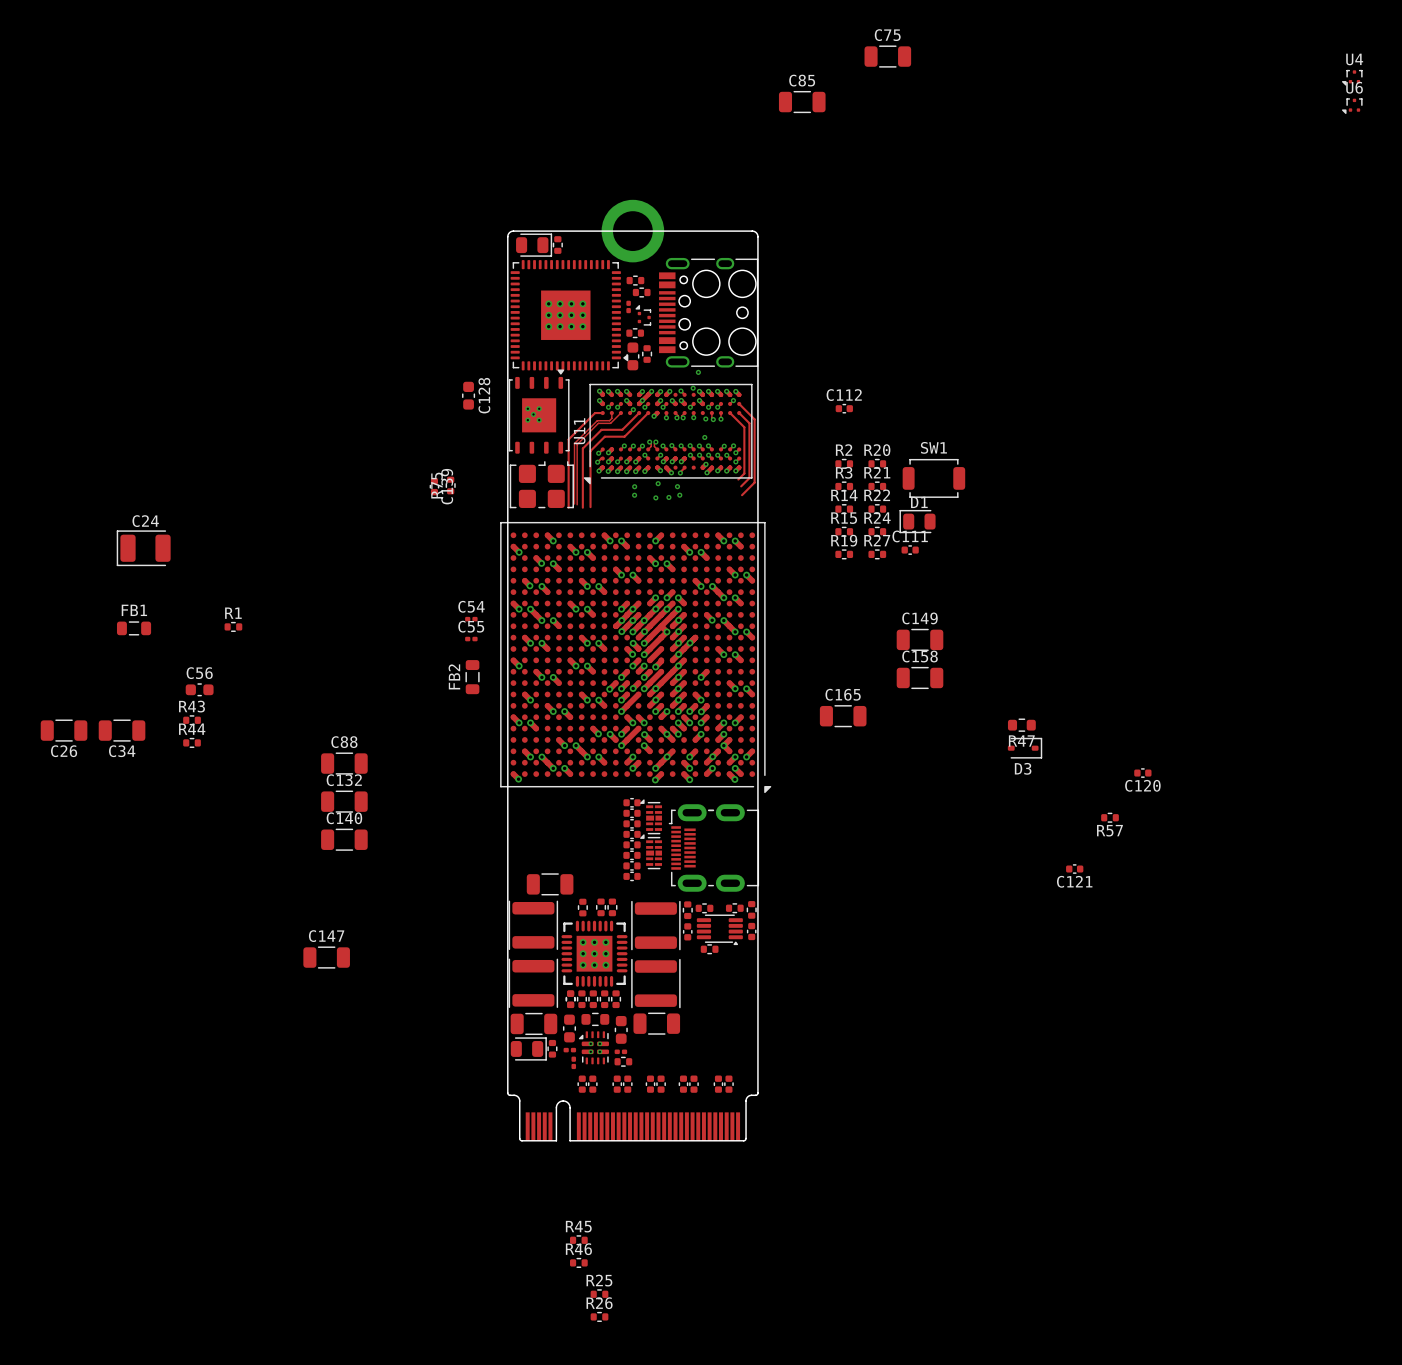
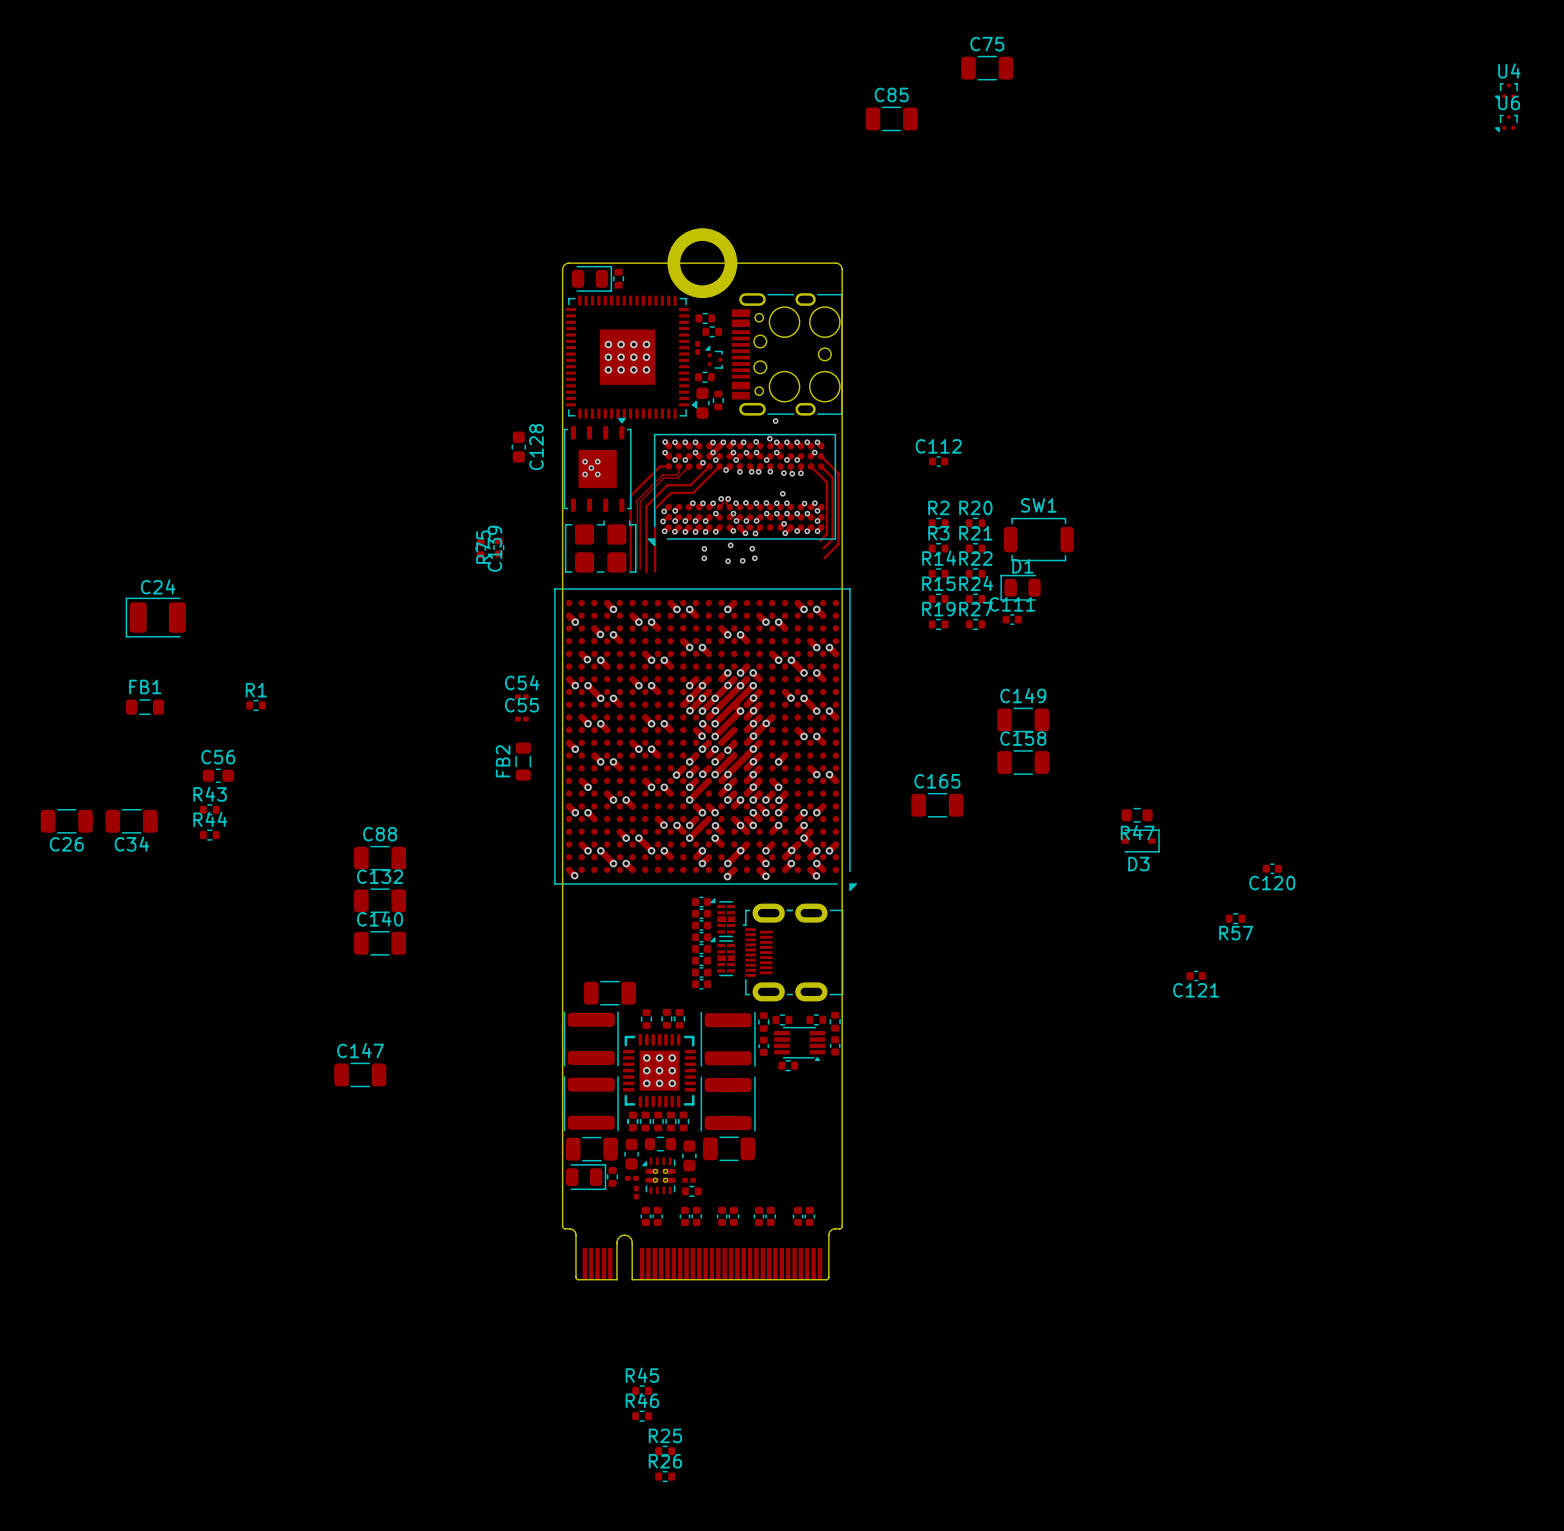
U11: (668, 434) -> none
part: none -> (741, 489)

